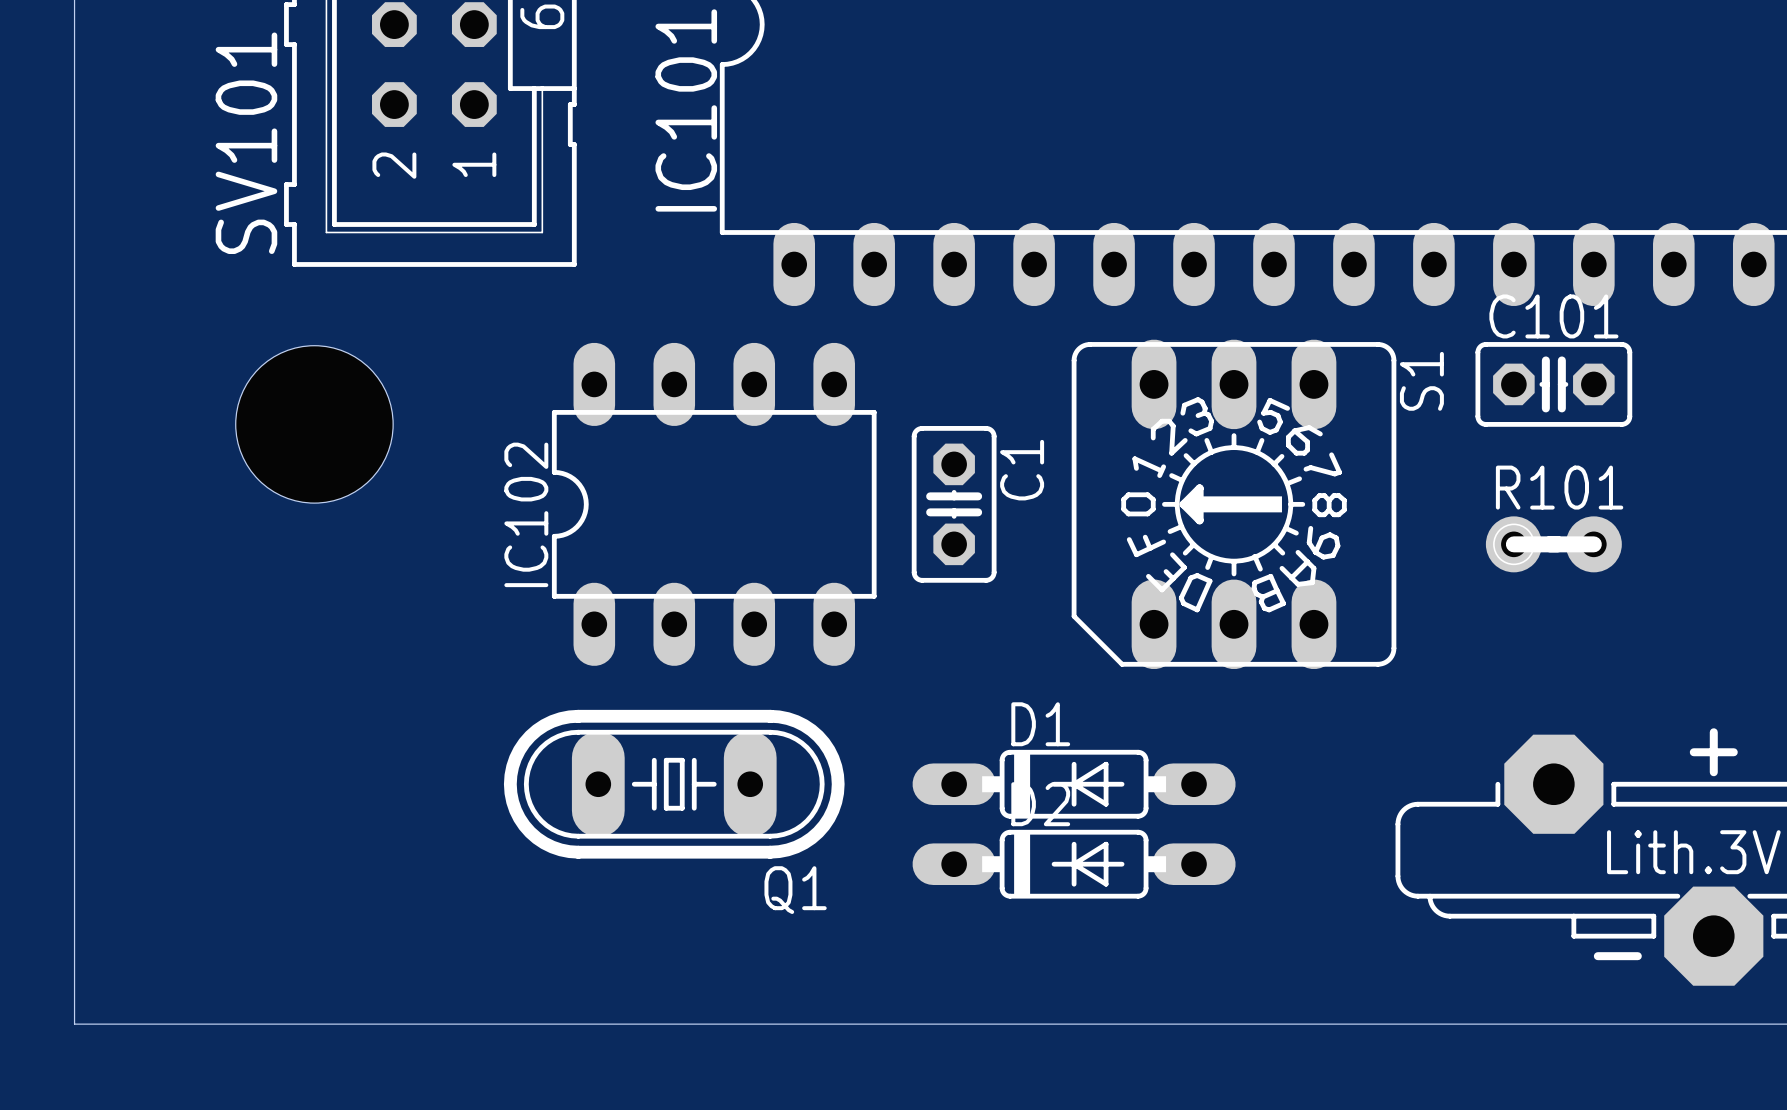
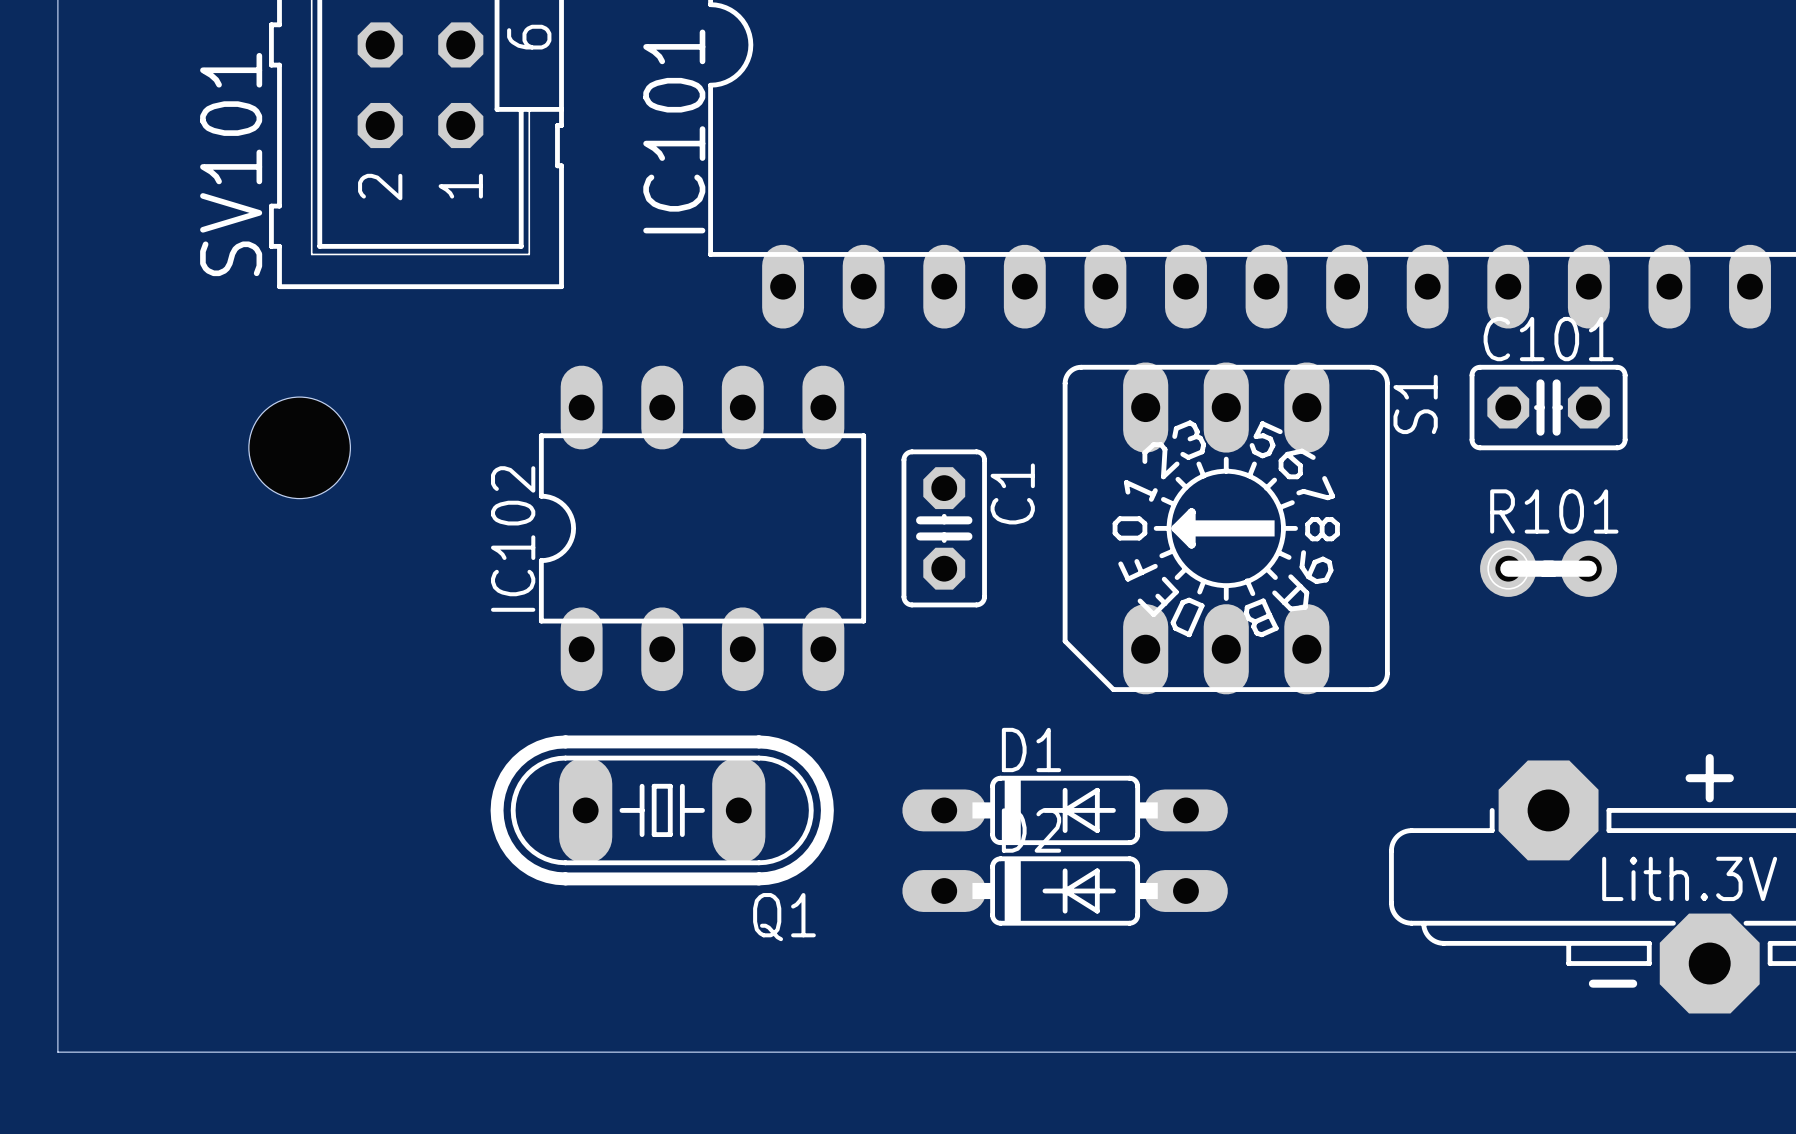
hole size: [235, 345, 394, 504] -> [248, 397, 351, 499]

